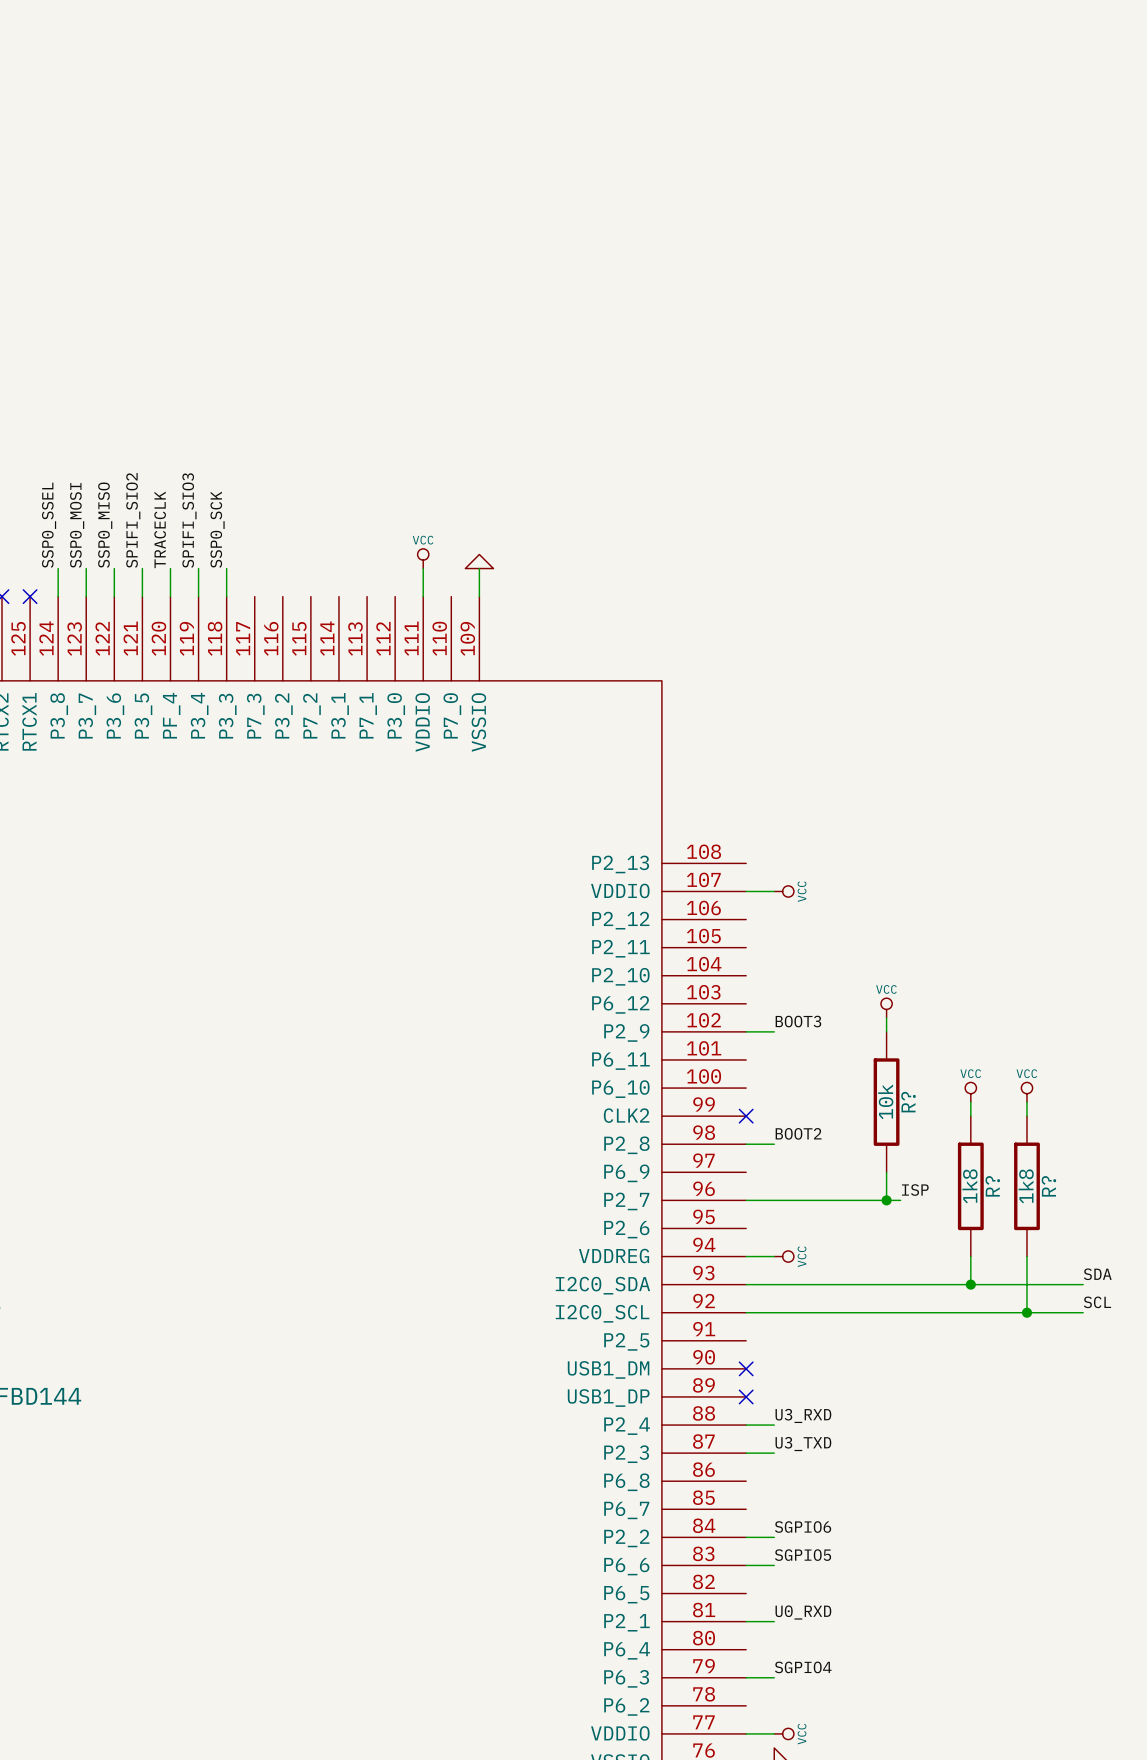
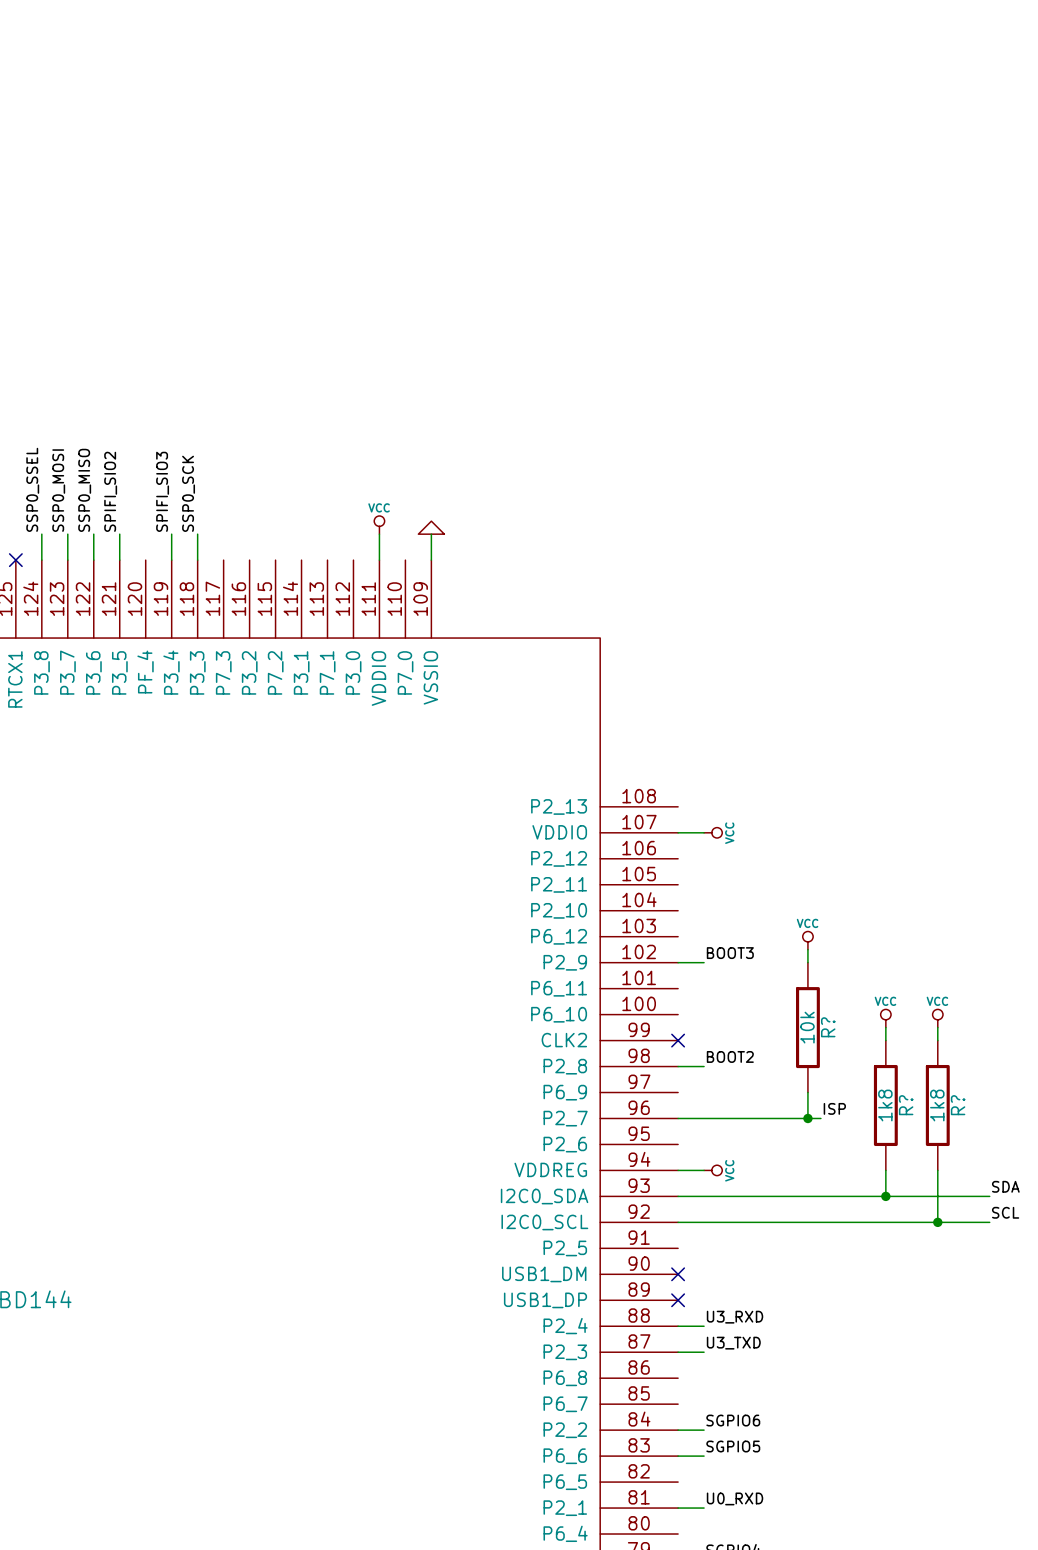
label: TRACECLK (160, 529) -> none
wire: (170, 568) (170, 596) -> none

